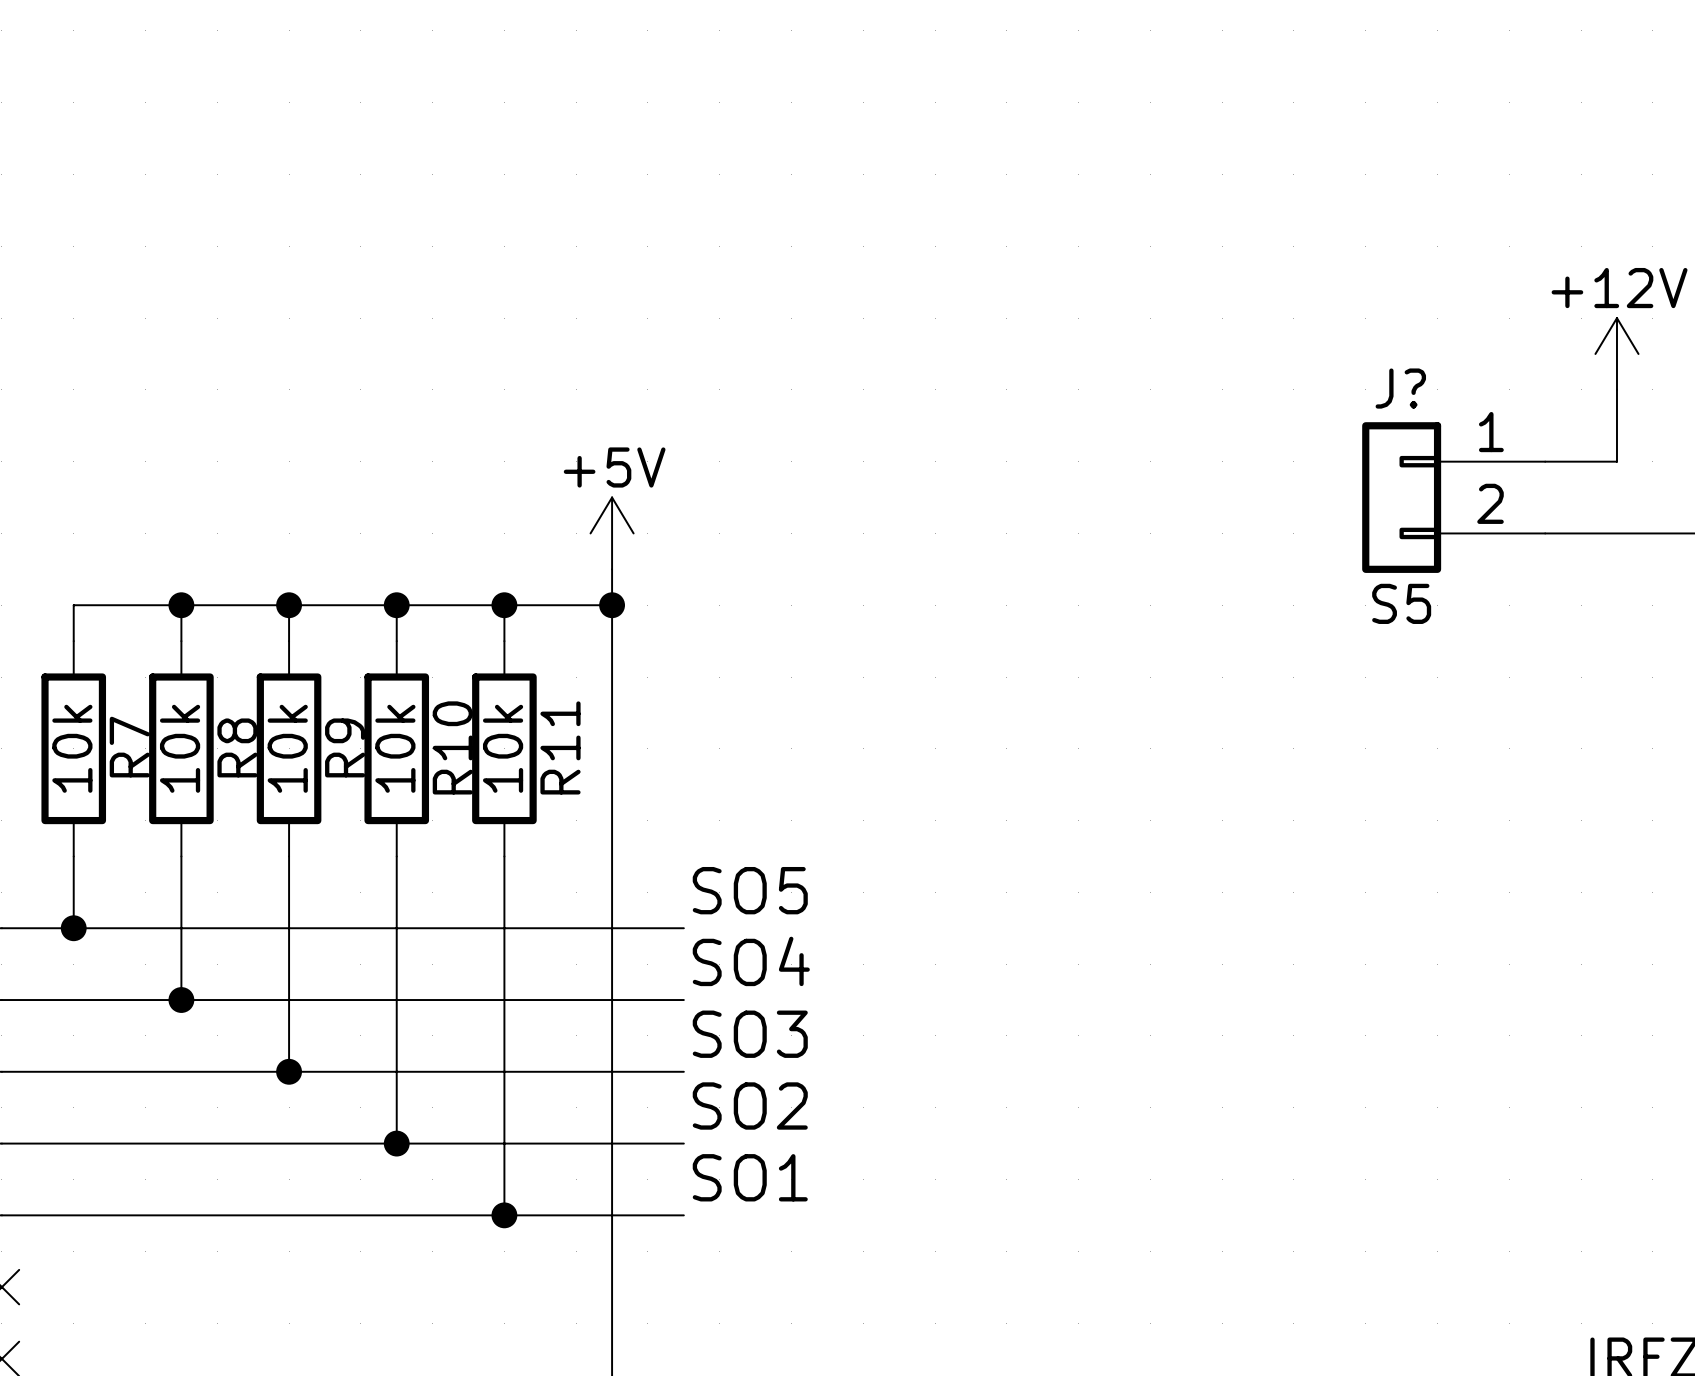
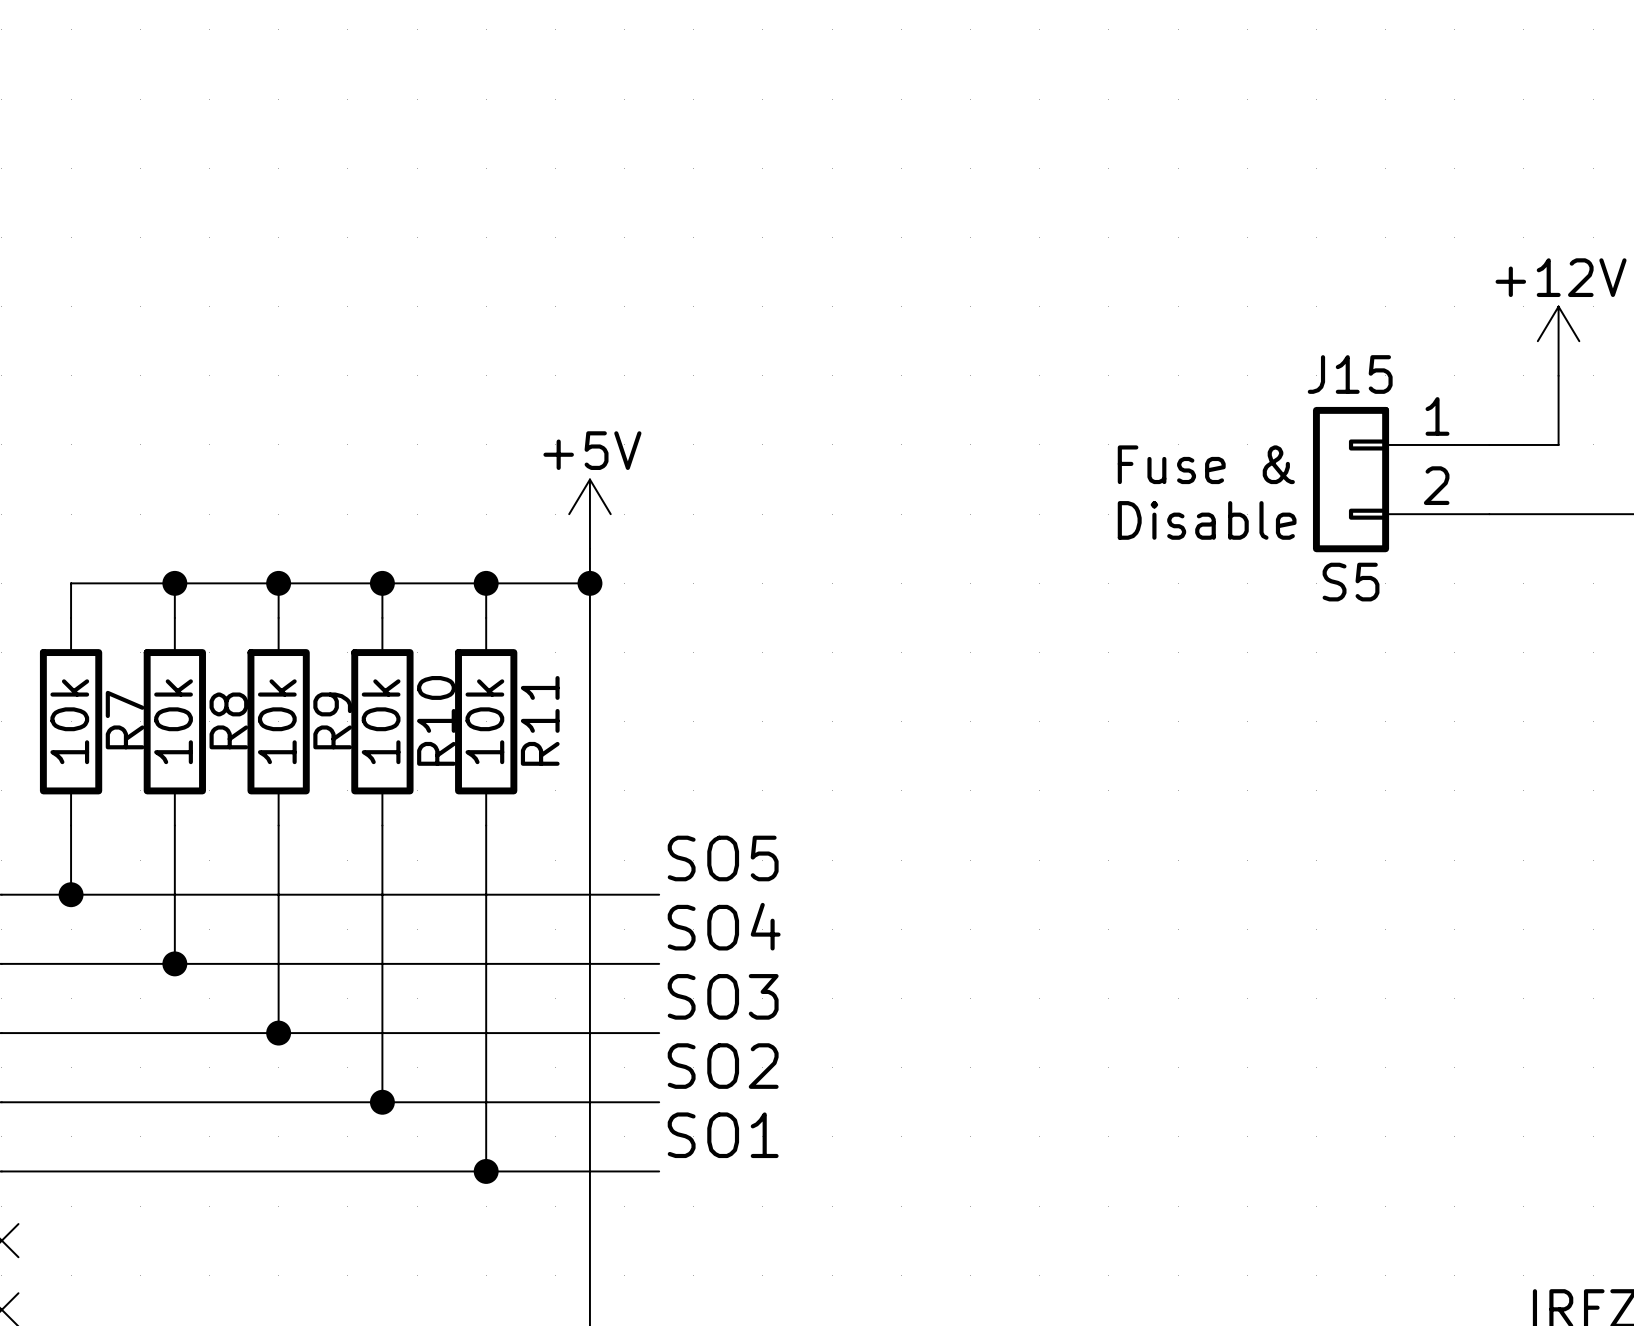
J? name: J? (1400, 388) -> J15 (1350, 374)
text: none -> Fuse & (1206, 464)
text: none -> Disable (1207, 520)

